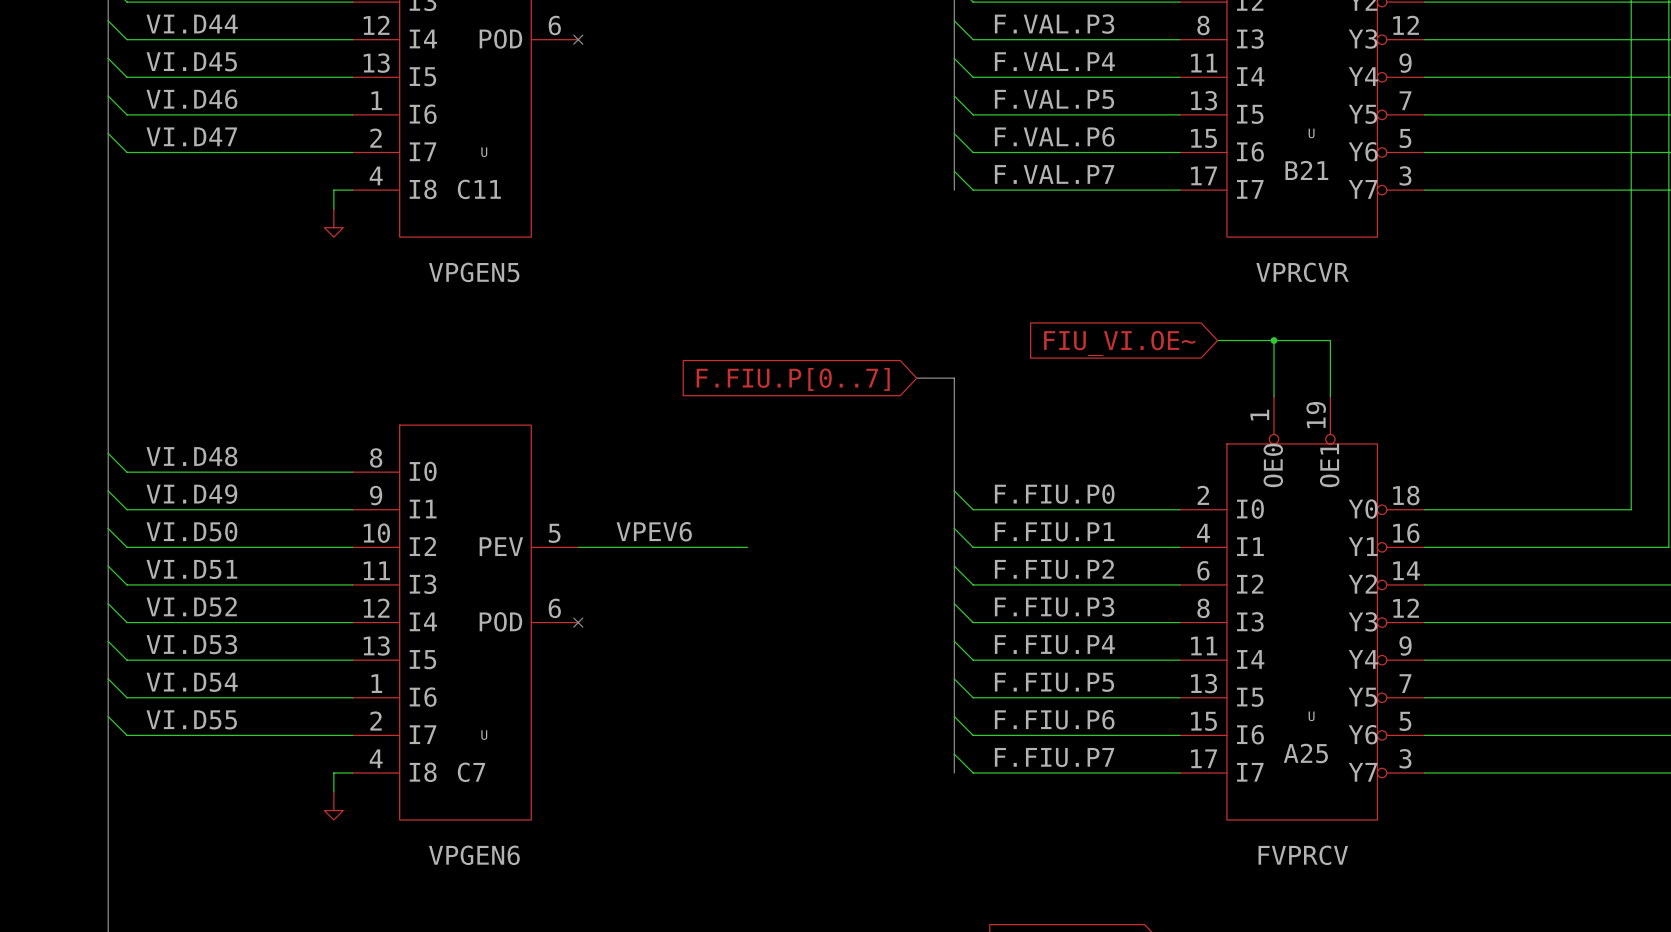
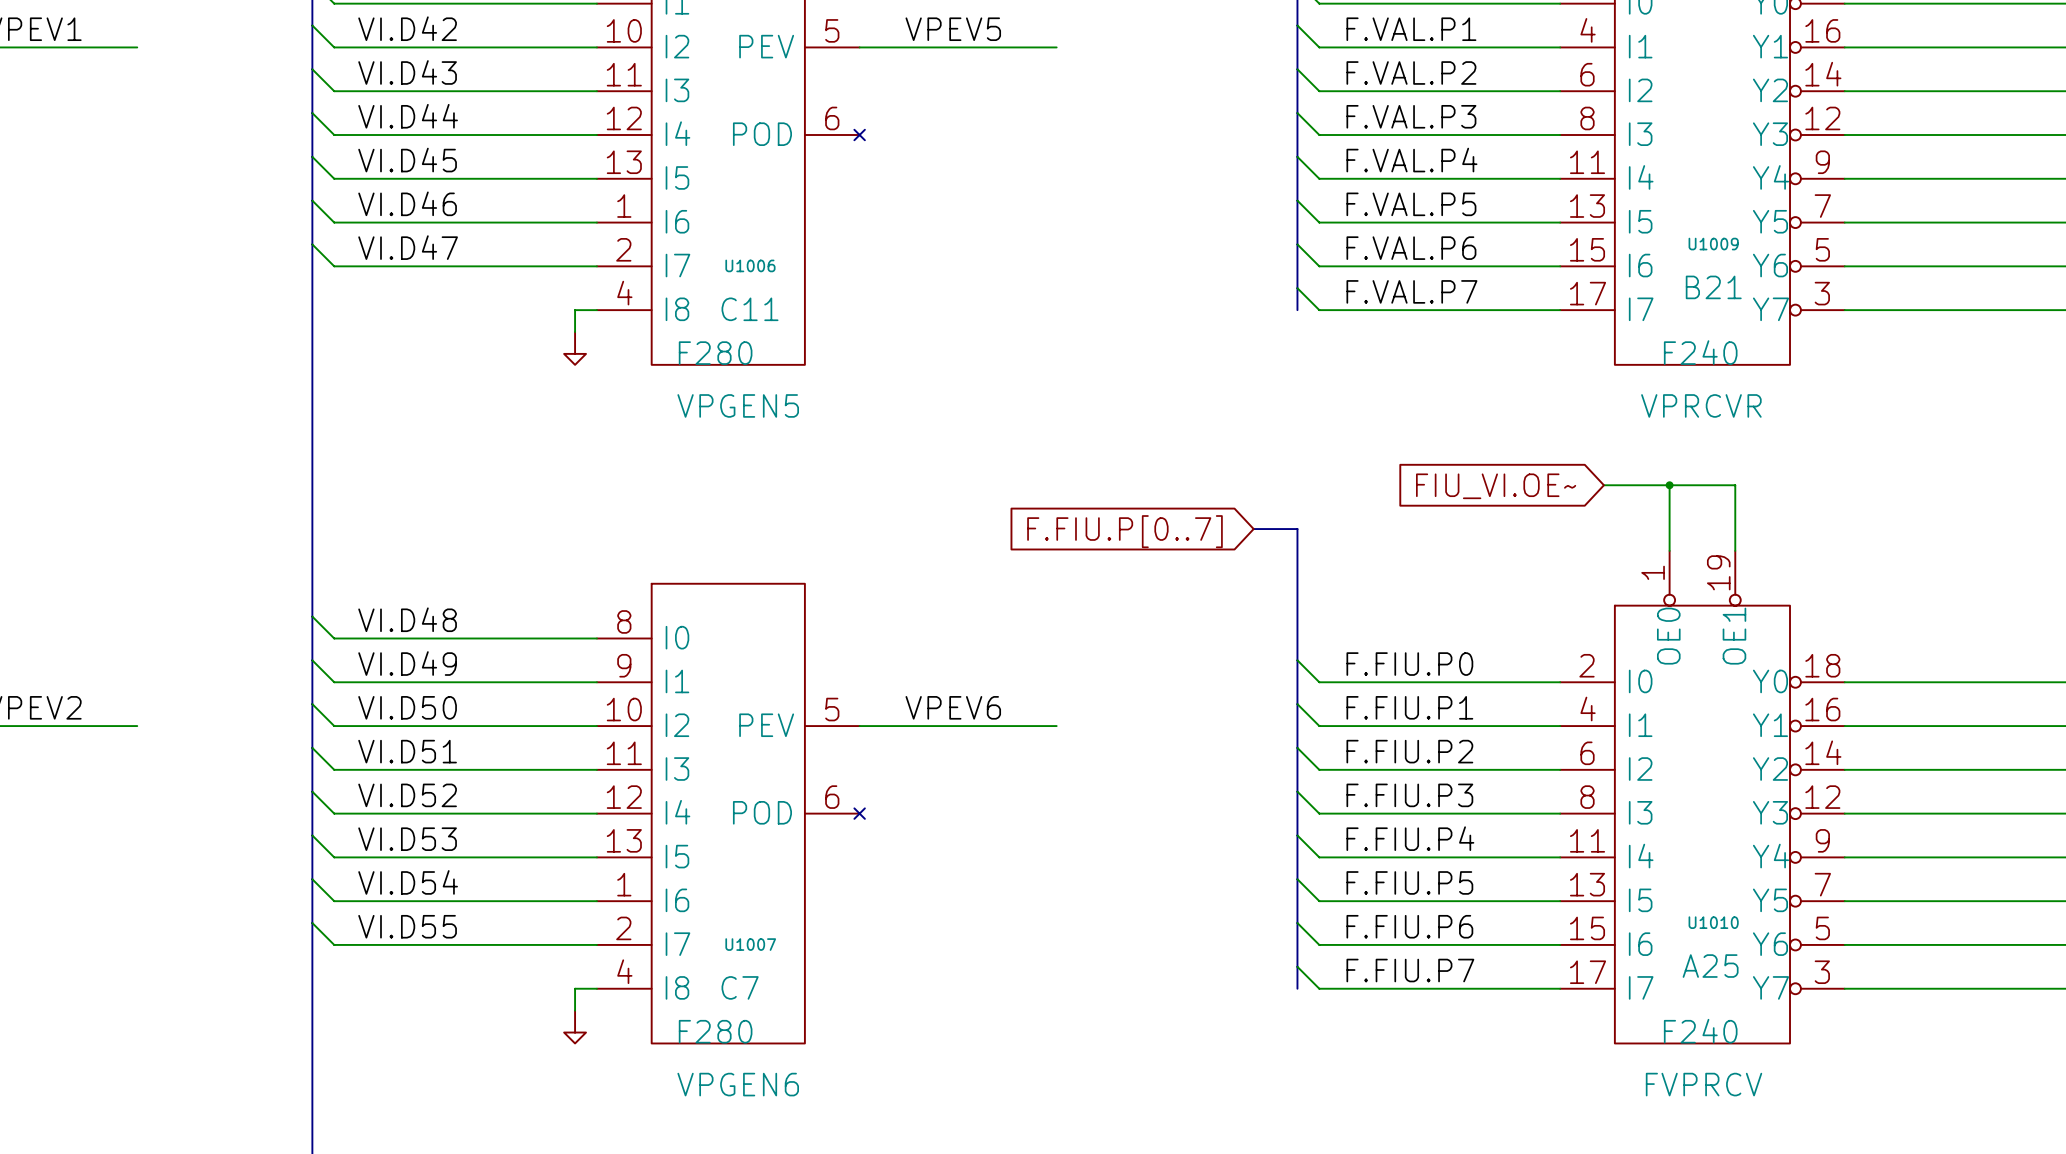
U name: U (1311, 133) -> U1009 (1713, 244)
U name: U (484, 152) -> U1006 (750, 265)
U value: none -> F280 (715, 353)
U value: none -> F240 (1700, 352)
U name: U (1311, 716) -> U1010 (1713, 922)
U name: U (484, 735) -> U1007 (750, 944)
U value: none -> F280 (715, 1031)
U value: none -> F240 (1700, 1031)

